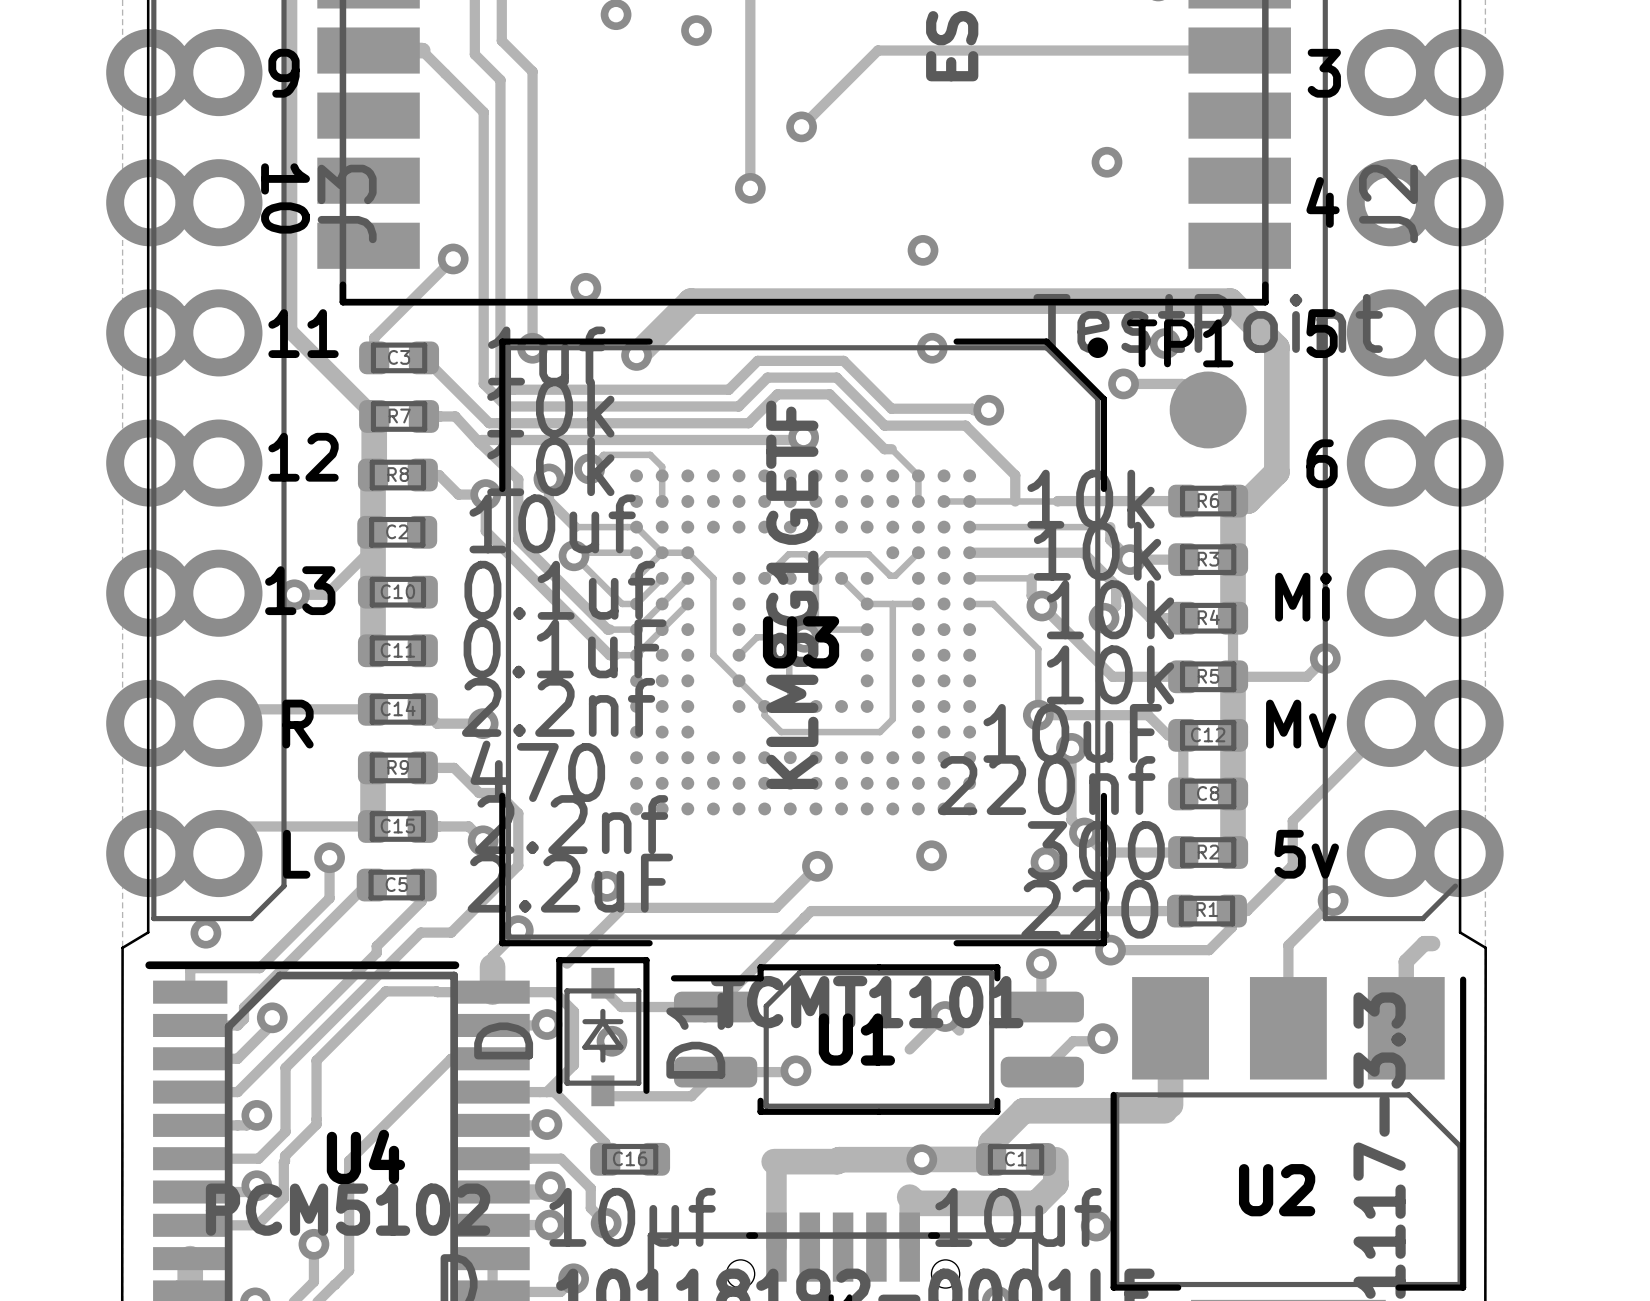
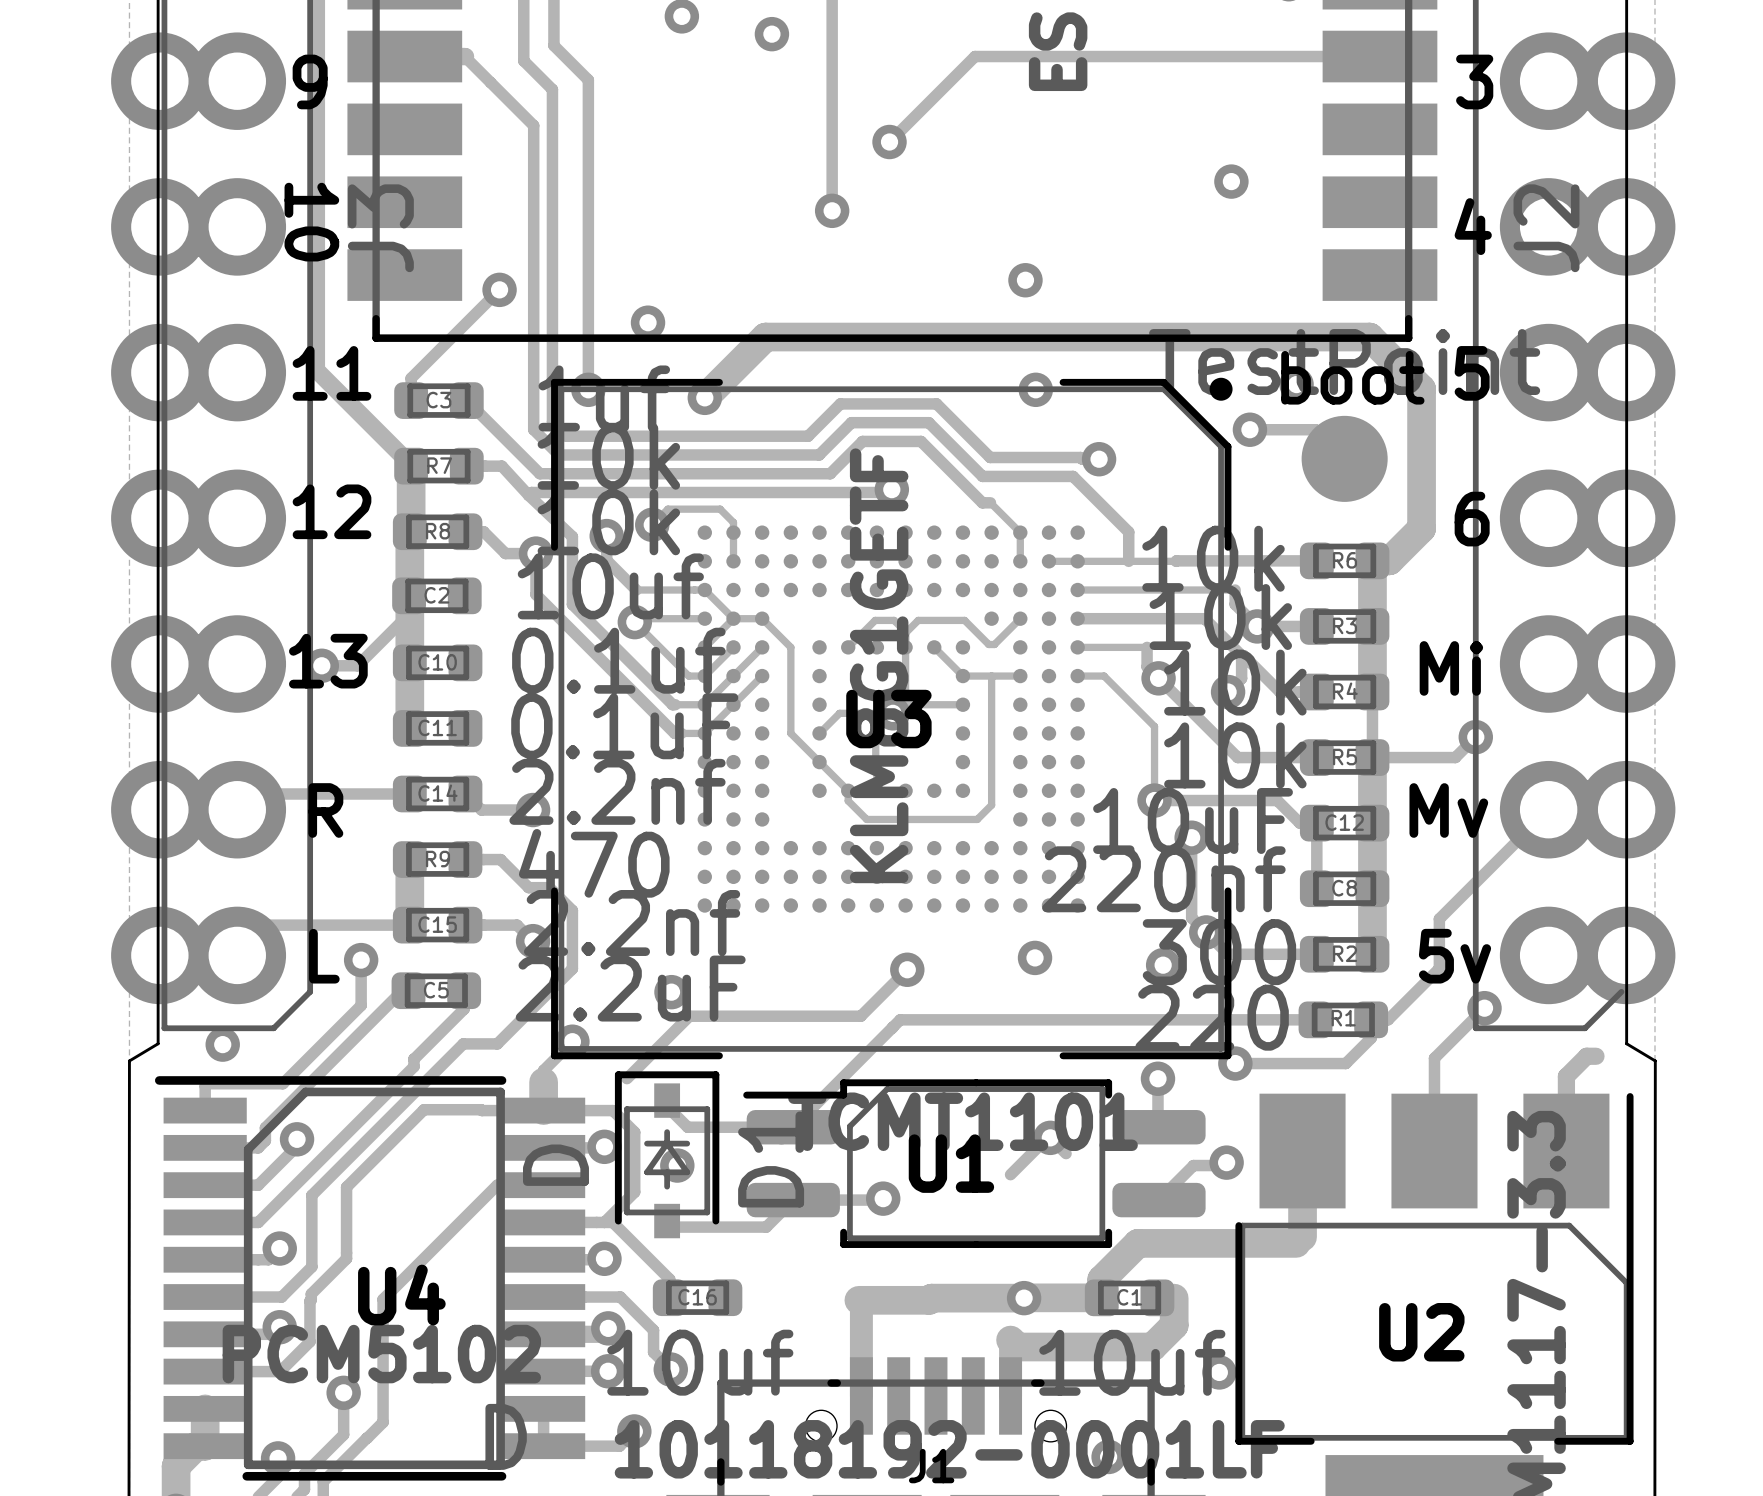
TP1 name: TP1 (1180, 343) -> boot (1352, 377)

